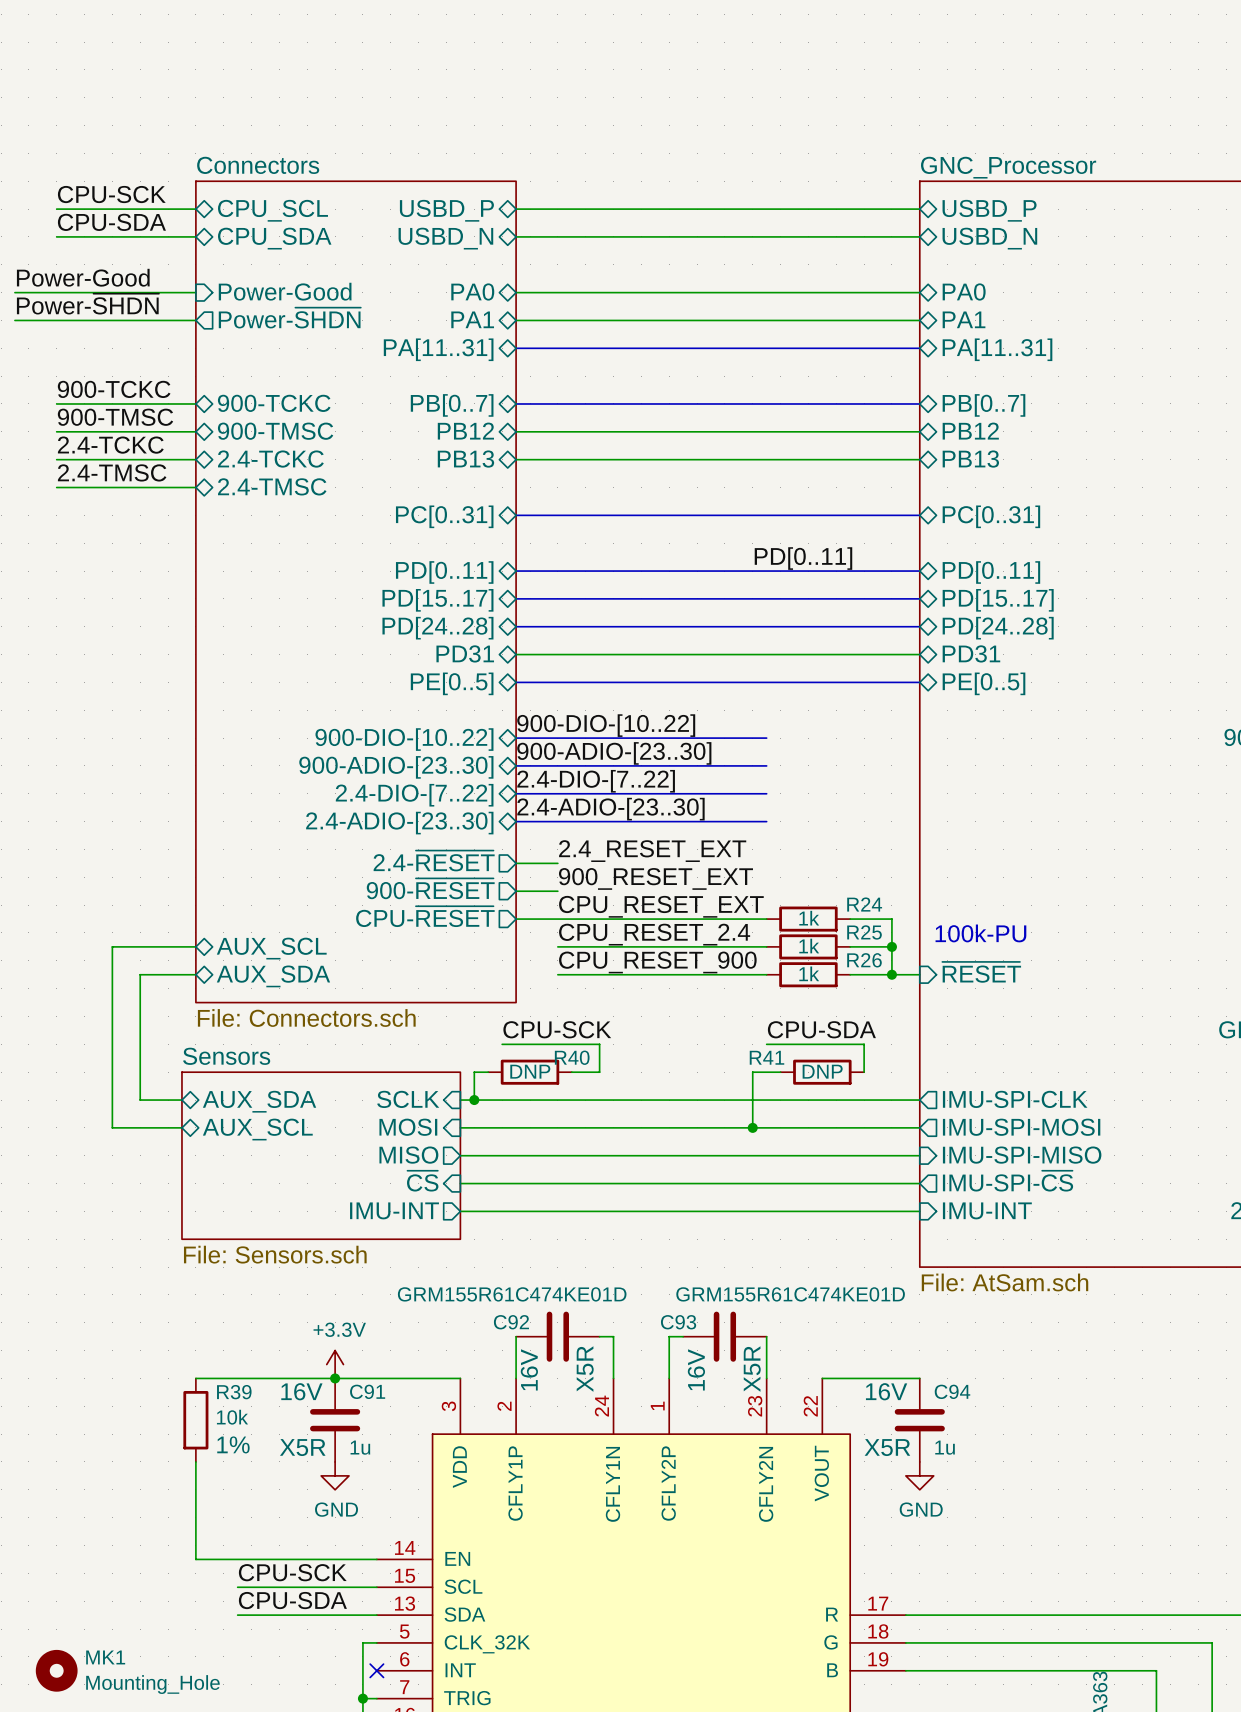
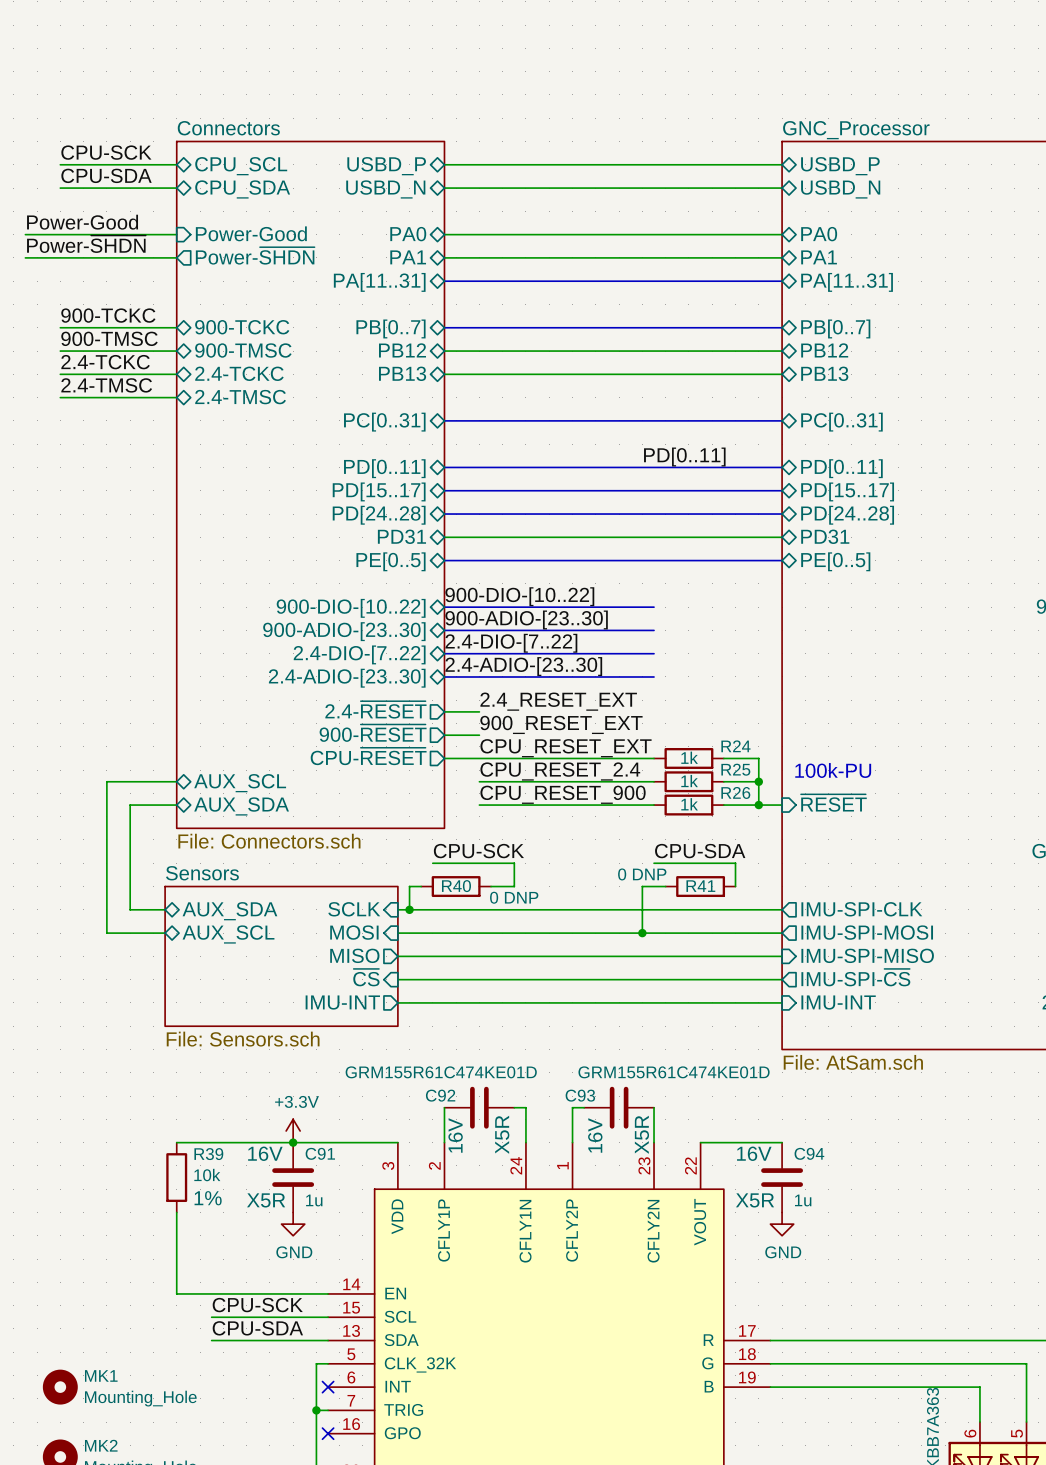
R40 name position: R40 (572, 1057) -> R40 (456, 886)
R41 name position: R41 (766, 1057) -> R41 (700, 886)
R40 value: DNP (530, 1071) -> 0 DNP (514, 897)
R41 value: DNP (822, 1071) -> 0 DNP (642, 874)

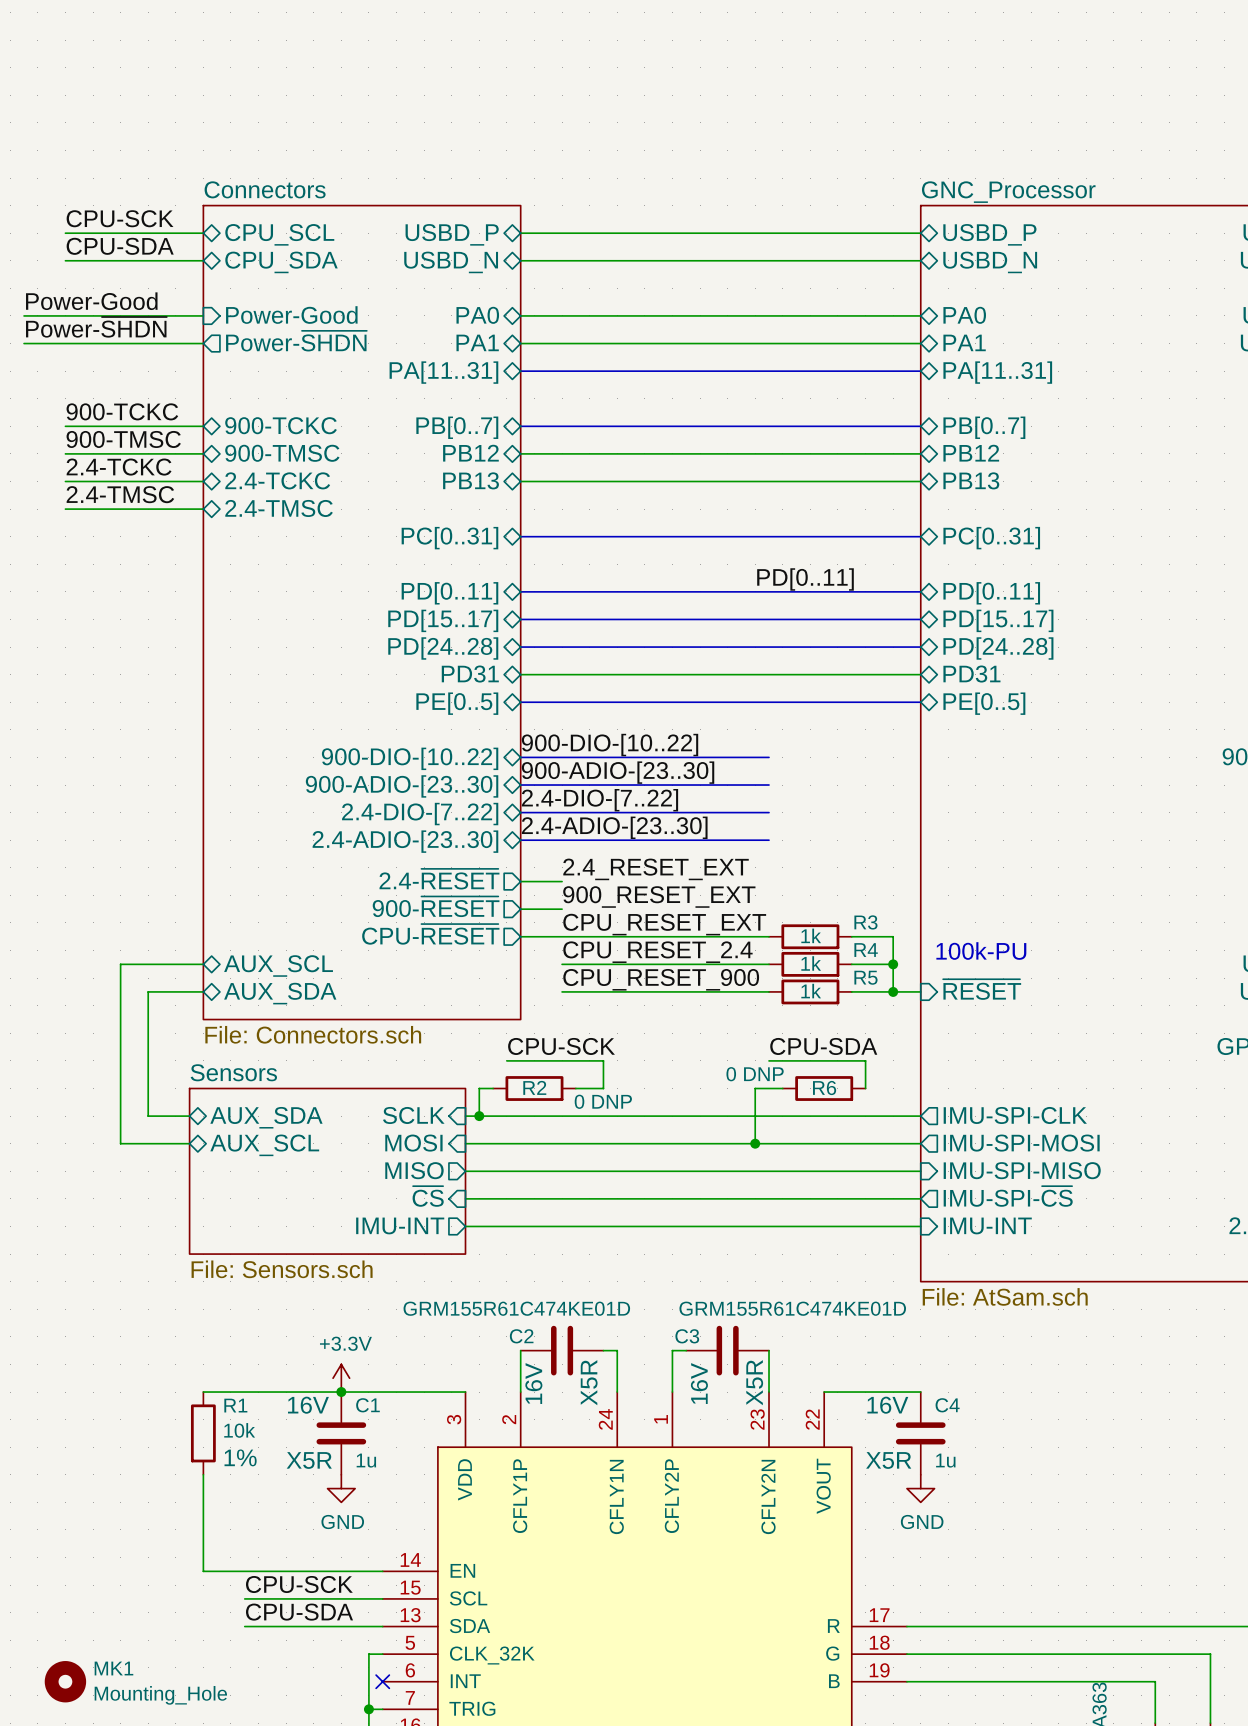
R24 name: R24 (735, 746) -> R3 (865, 922)
R25 name: R25 (735, 769) -> R4 (866, 950)
R26 name: R26 (735, 792) -> R5 (865, 977)
R40 name: R40 (456, 886) -> R2 (534, 1087)
R41 name: R41 (700, 886) -> R6 (824, 1087)
C92 name: C92 (440, 1095) -> C2 (521, 1336)
C93 name: C93 (580, 1095) -> C3 (687, 1336)
C91 name: C91 (320, 1153) -> C1 (367, 1405)
C94 name: C94 (809, 1153) -> C4 (947, 1405)
R39 name: R39 (208, 1154) -> R1 (235, 1405)

